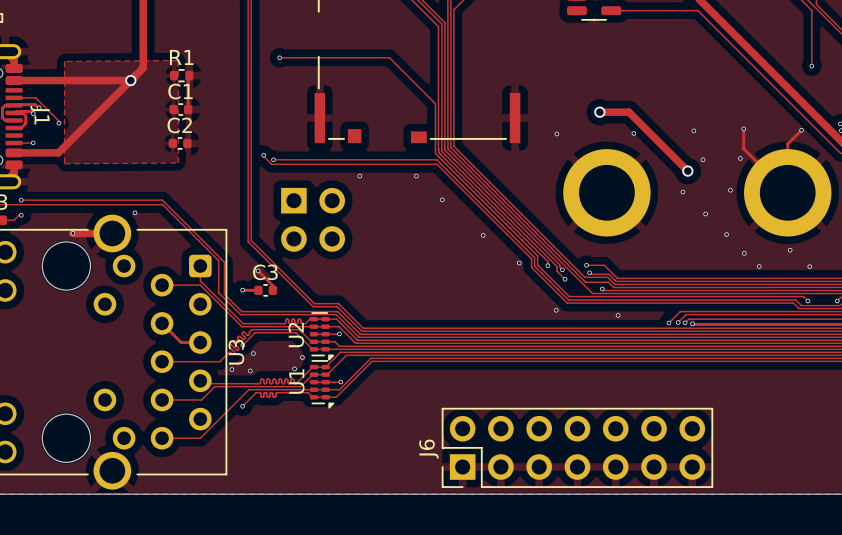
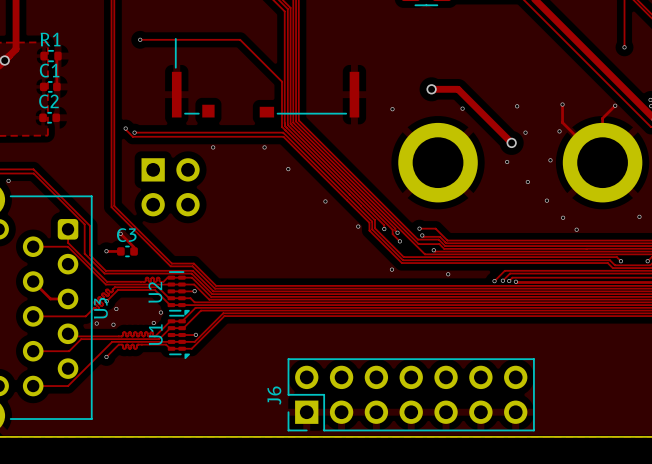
via: (790, 250) -> none
via: none -> (639, 216)
via: (809, 266) -> none

